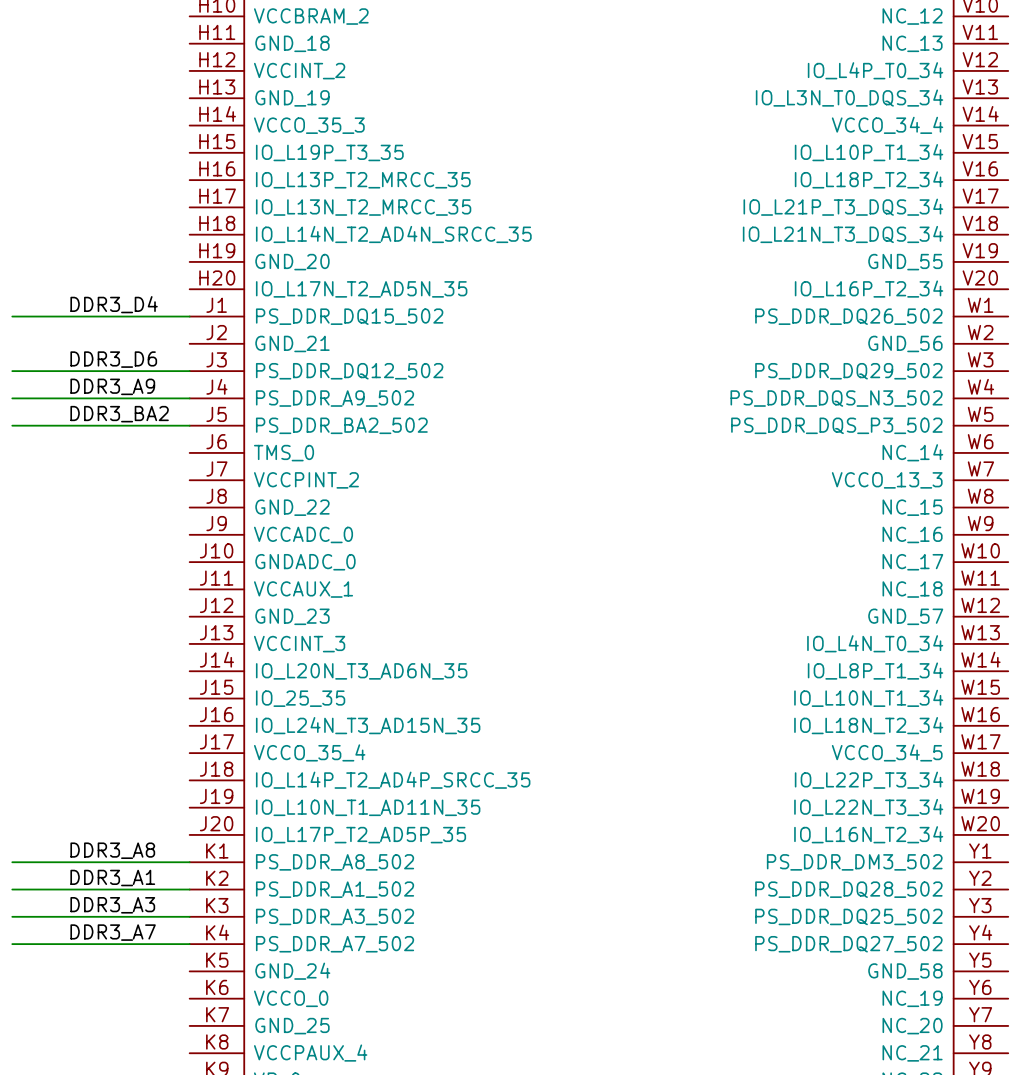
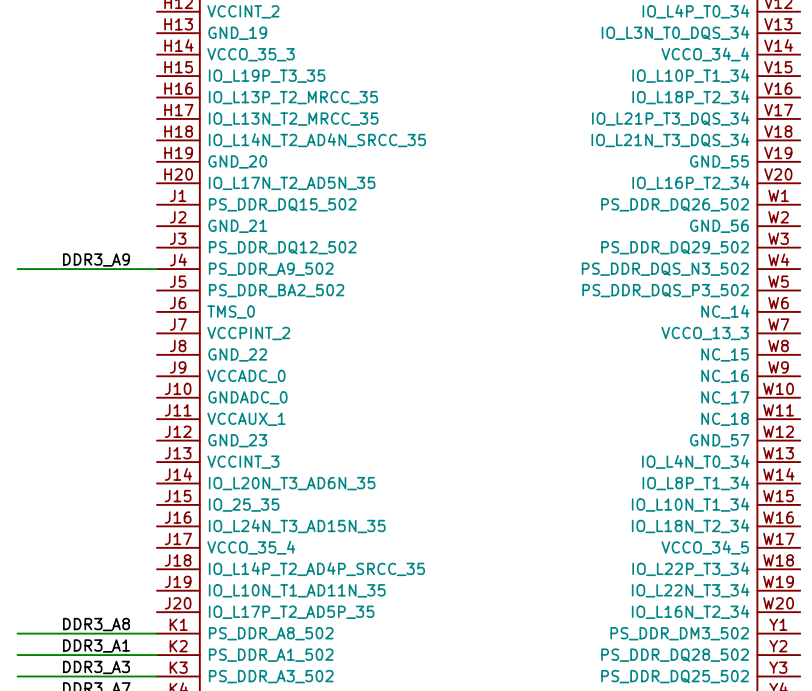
label: DDR3_D4 (114, 304) -> none
wire: (12, 316) (189, 316) -> none
label: DDR3_D6 (113, 359) -> none
wire: (12, 371) (189, 371) -> none
label: DDR3_BA2 (119, 414) -> none
wire: (12, 425) (189, 425) -> none

